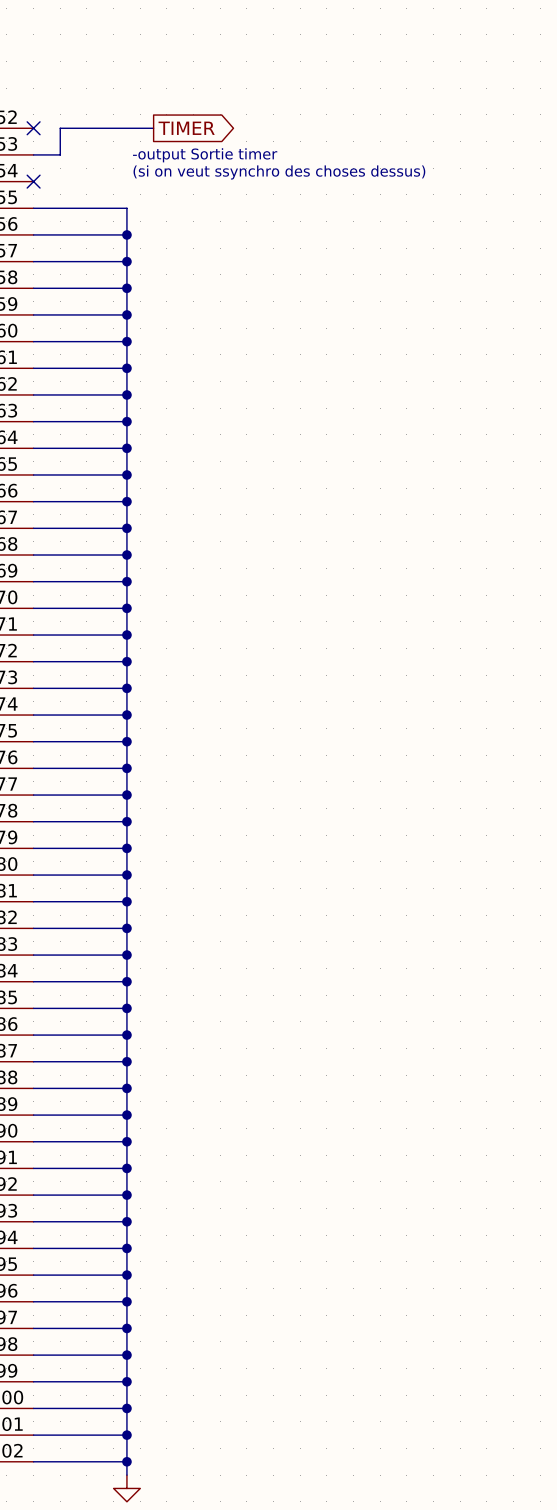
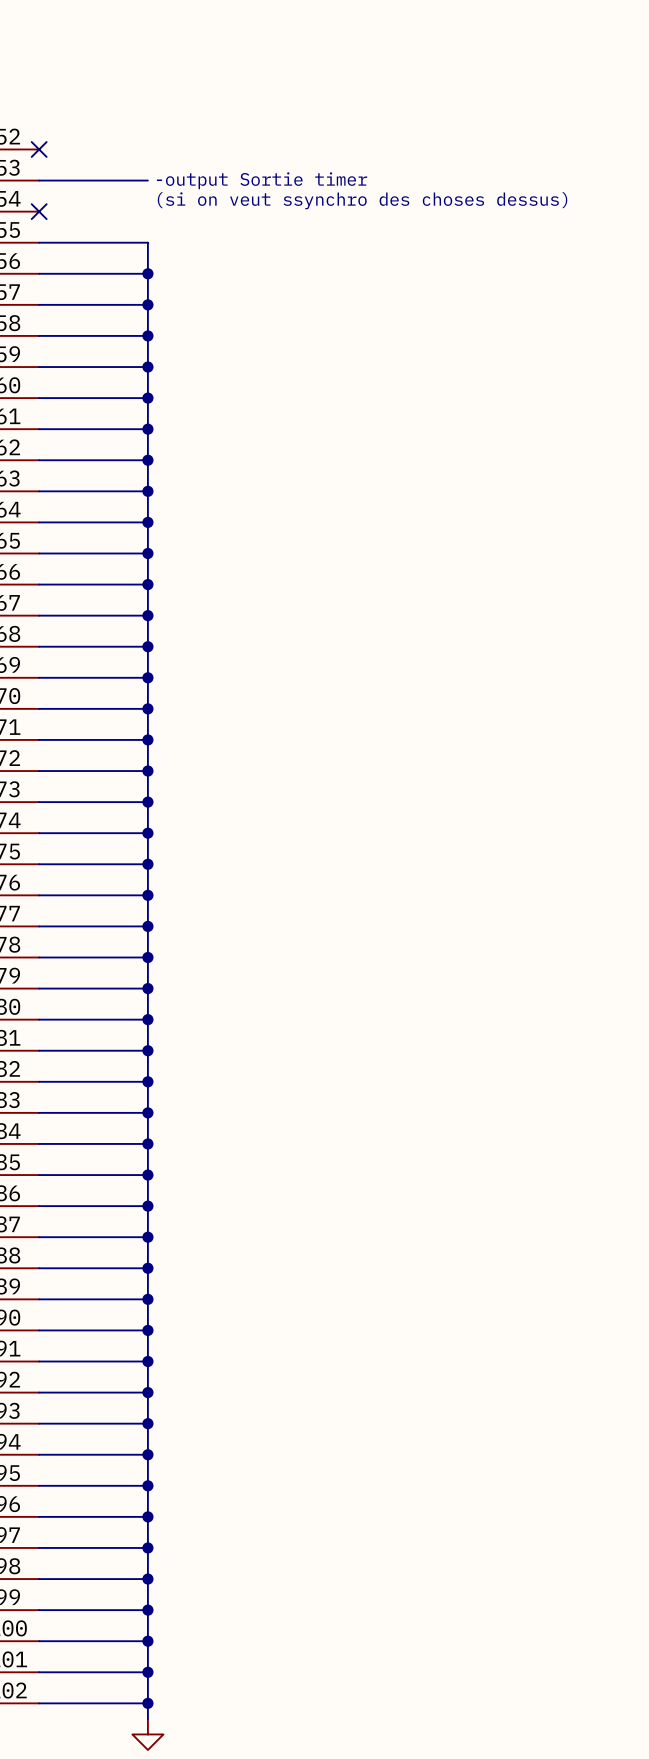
wire: (153, 128) (60, 128) (60, 154) -> (147, 180) (70, 180)
global label: TIMER (186, 128) -> none

